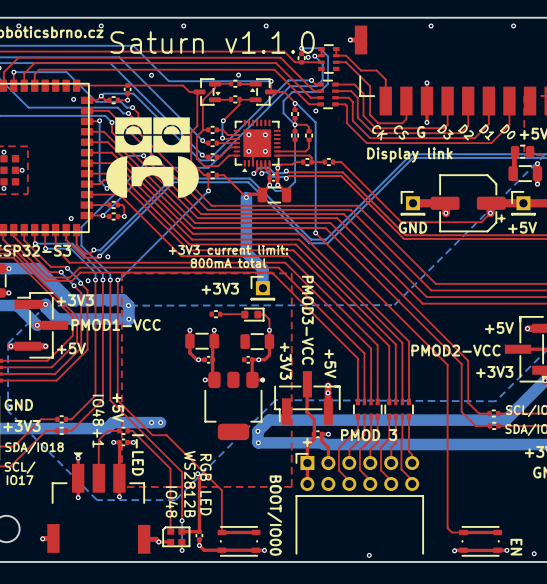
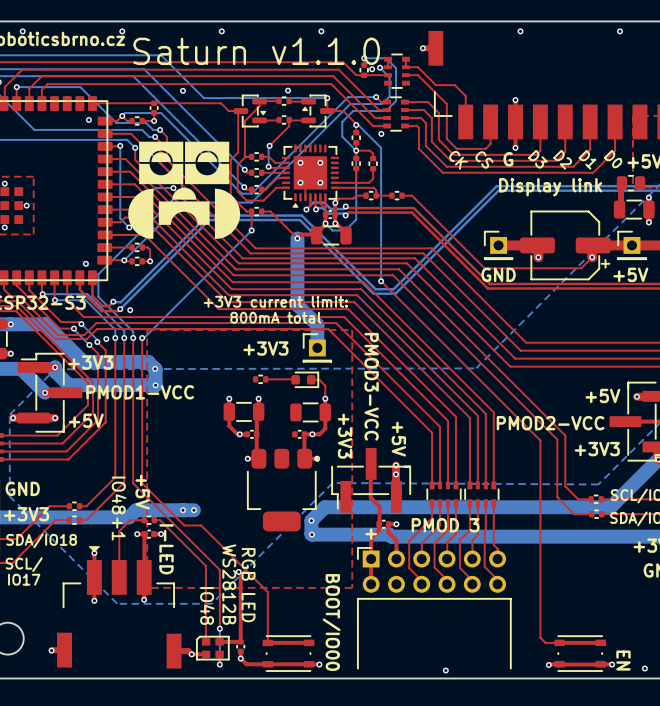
text position: Display link (409, 155) -> Display link (550, 187)

